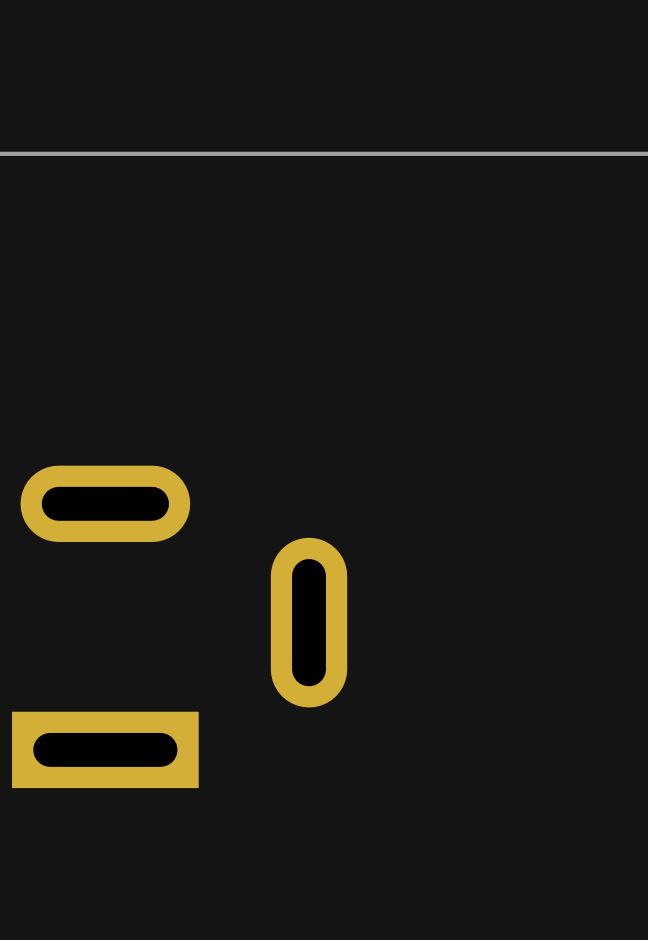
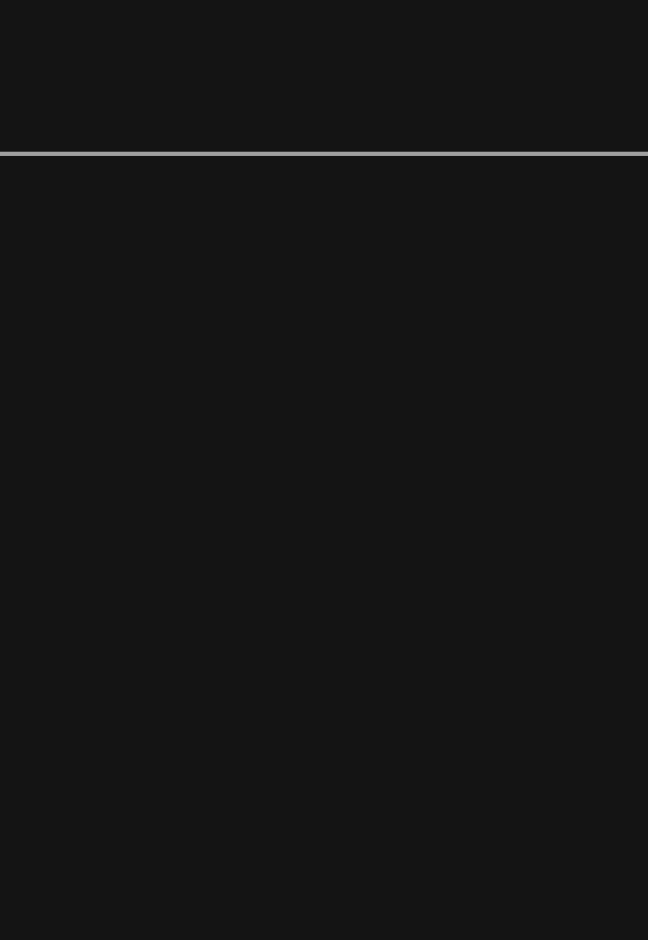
part: (179, 626) -> none

